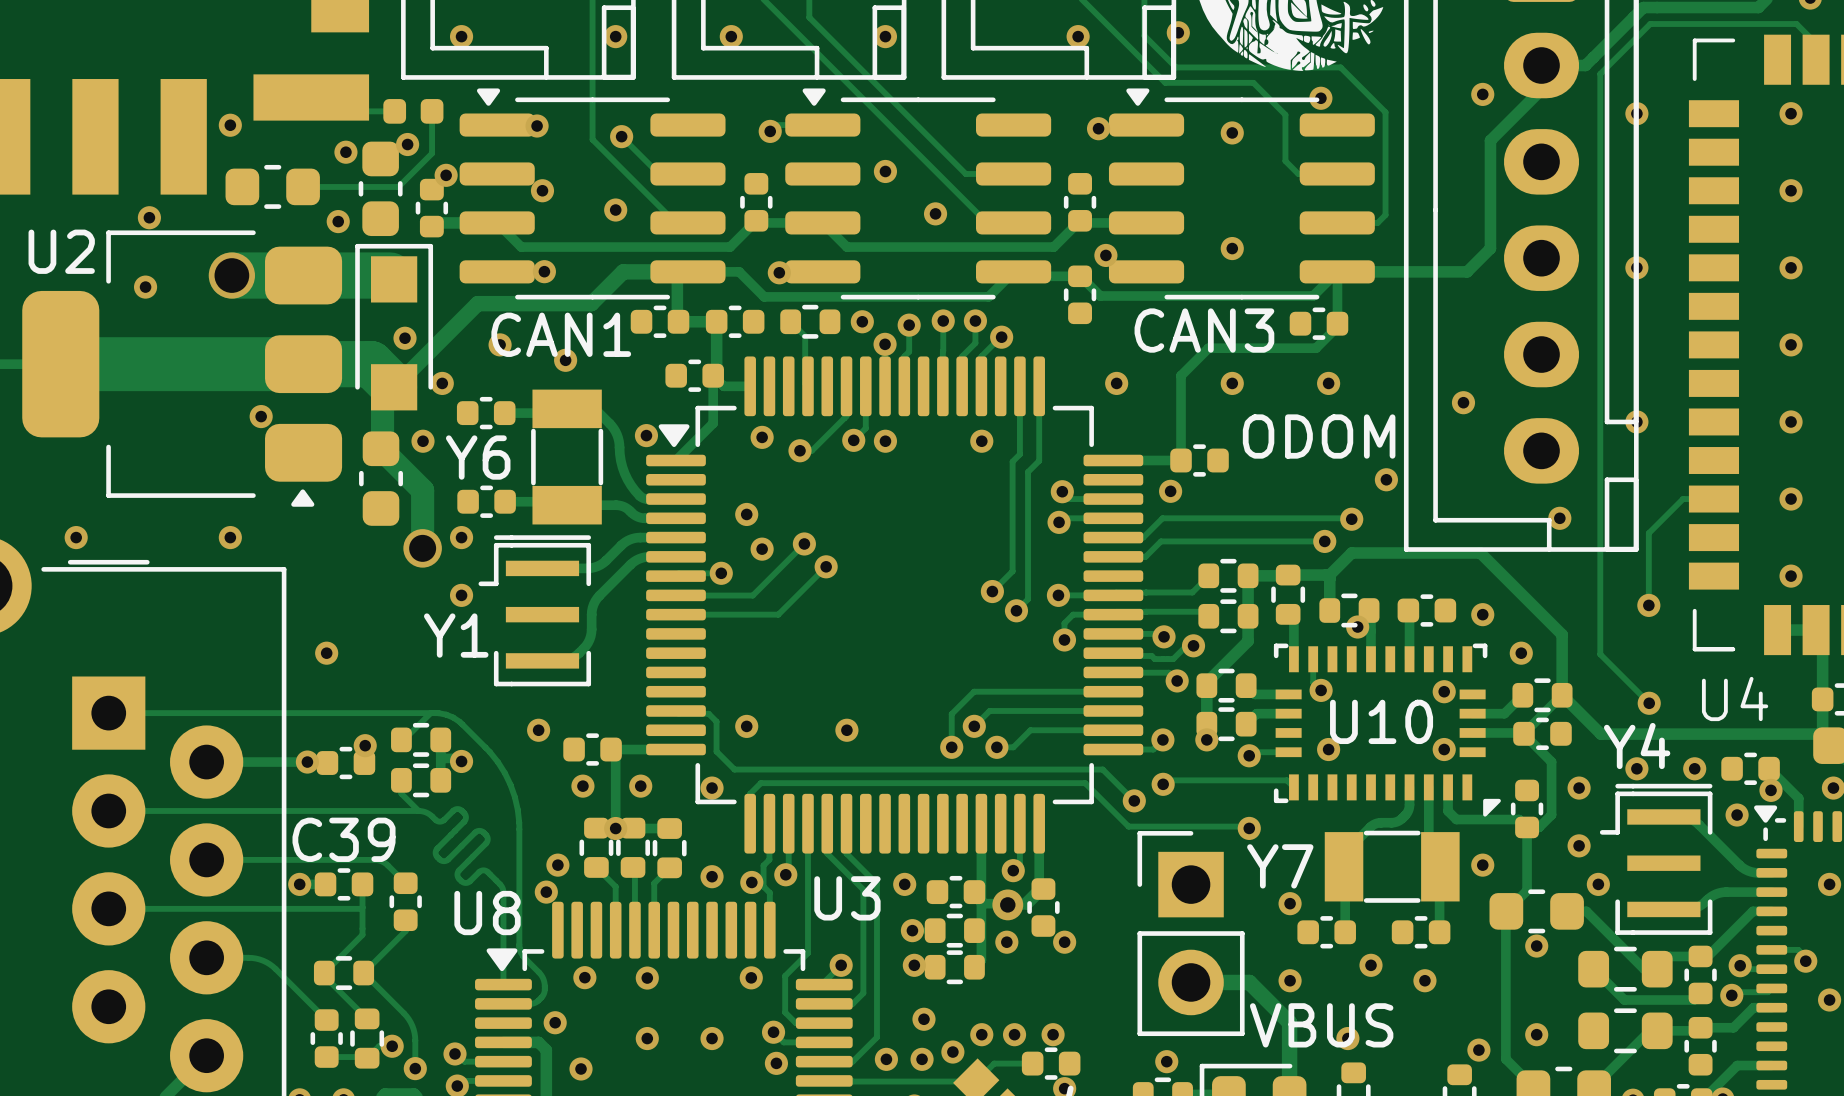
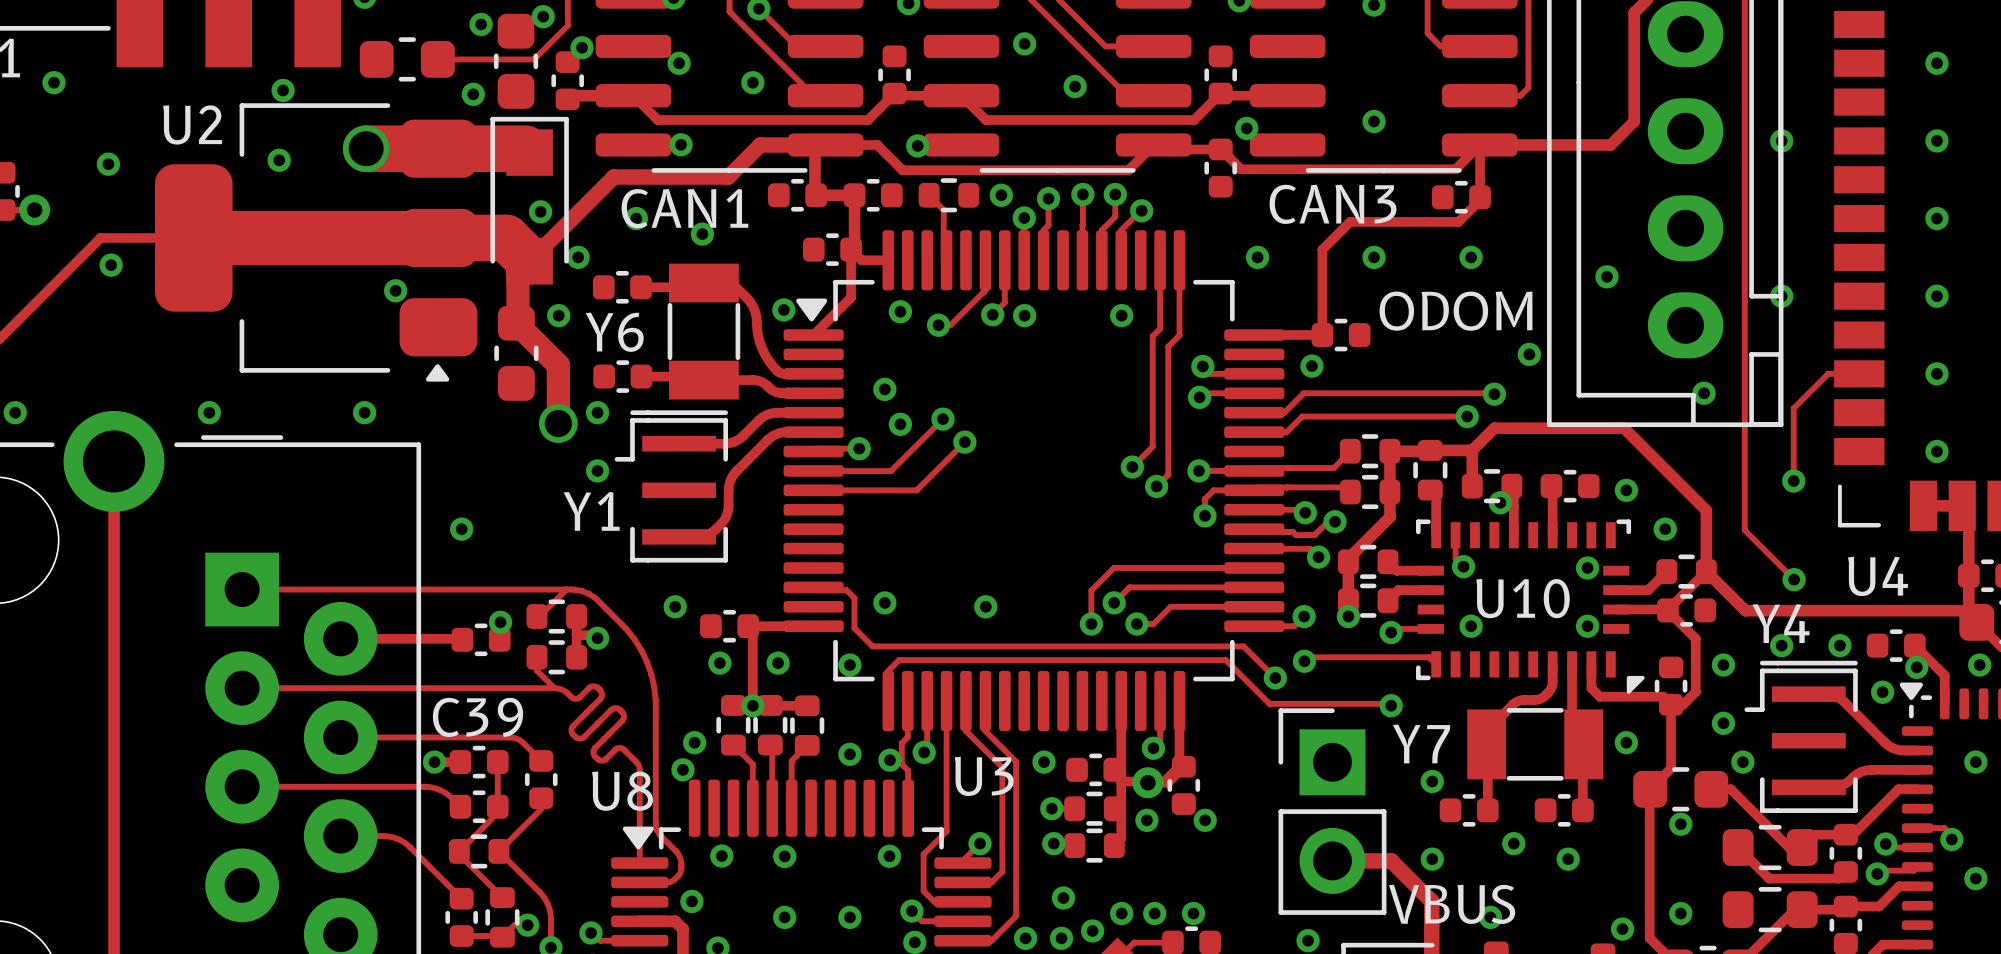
via: (307, 762) -> none
track: (362, 907) (289, 908) -> (460, 806) (442, 791) (424, 786)
part: none -> (479, 806)

